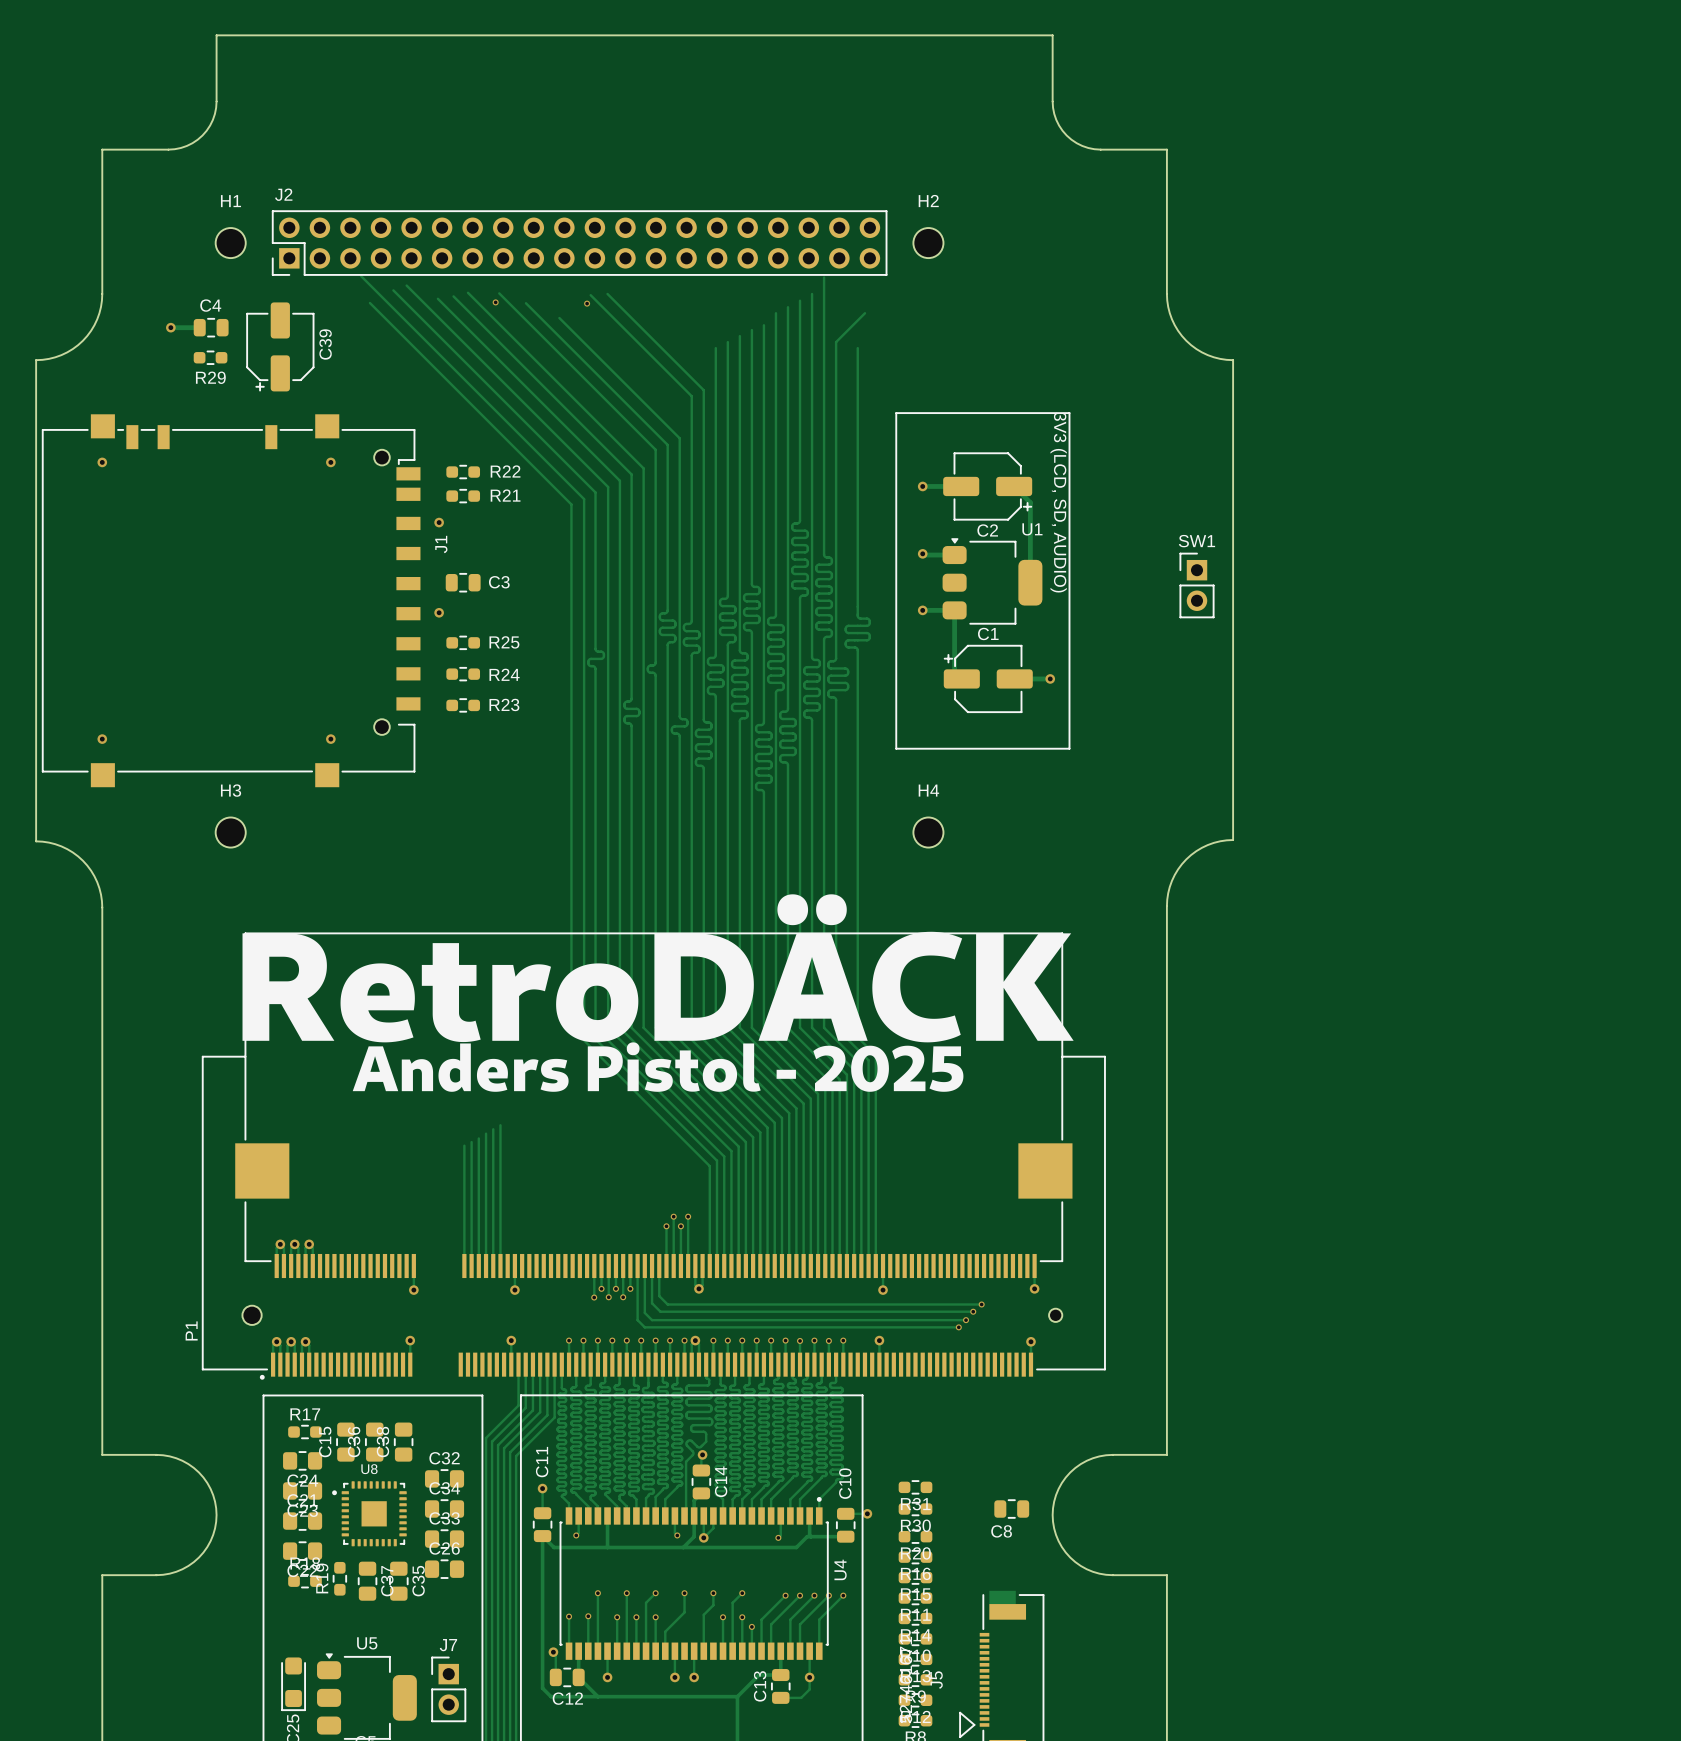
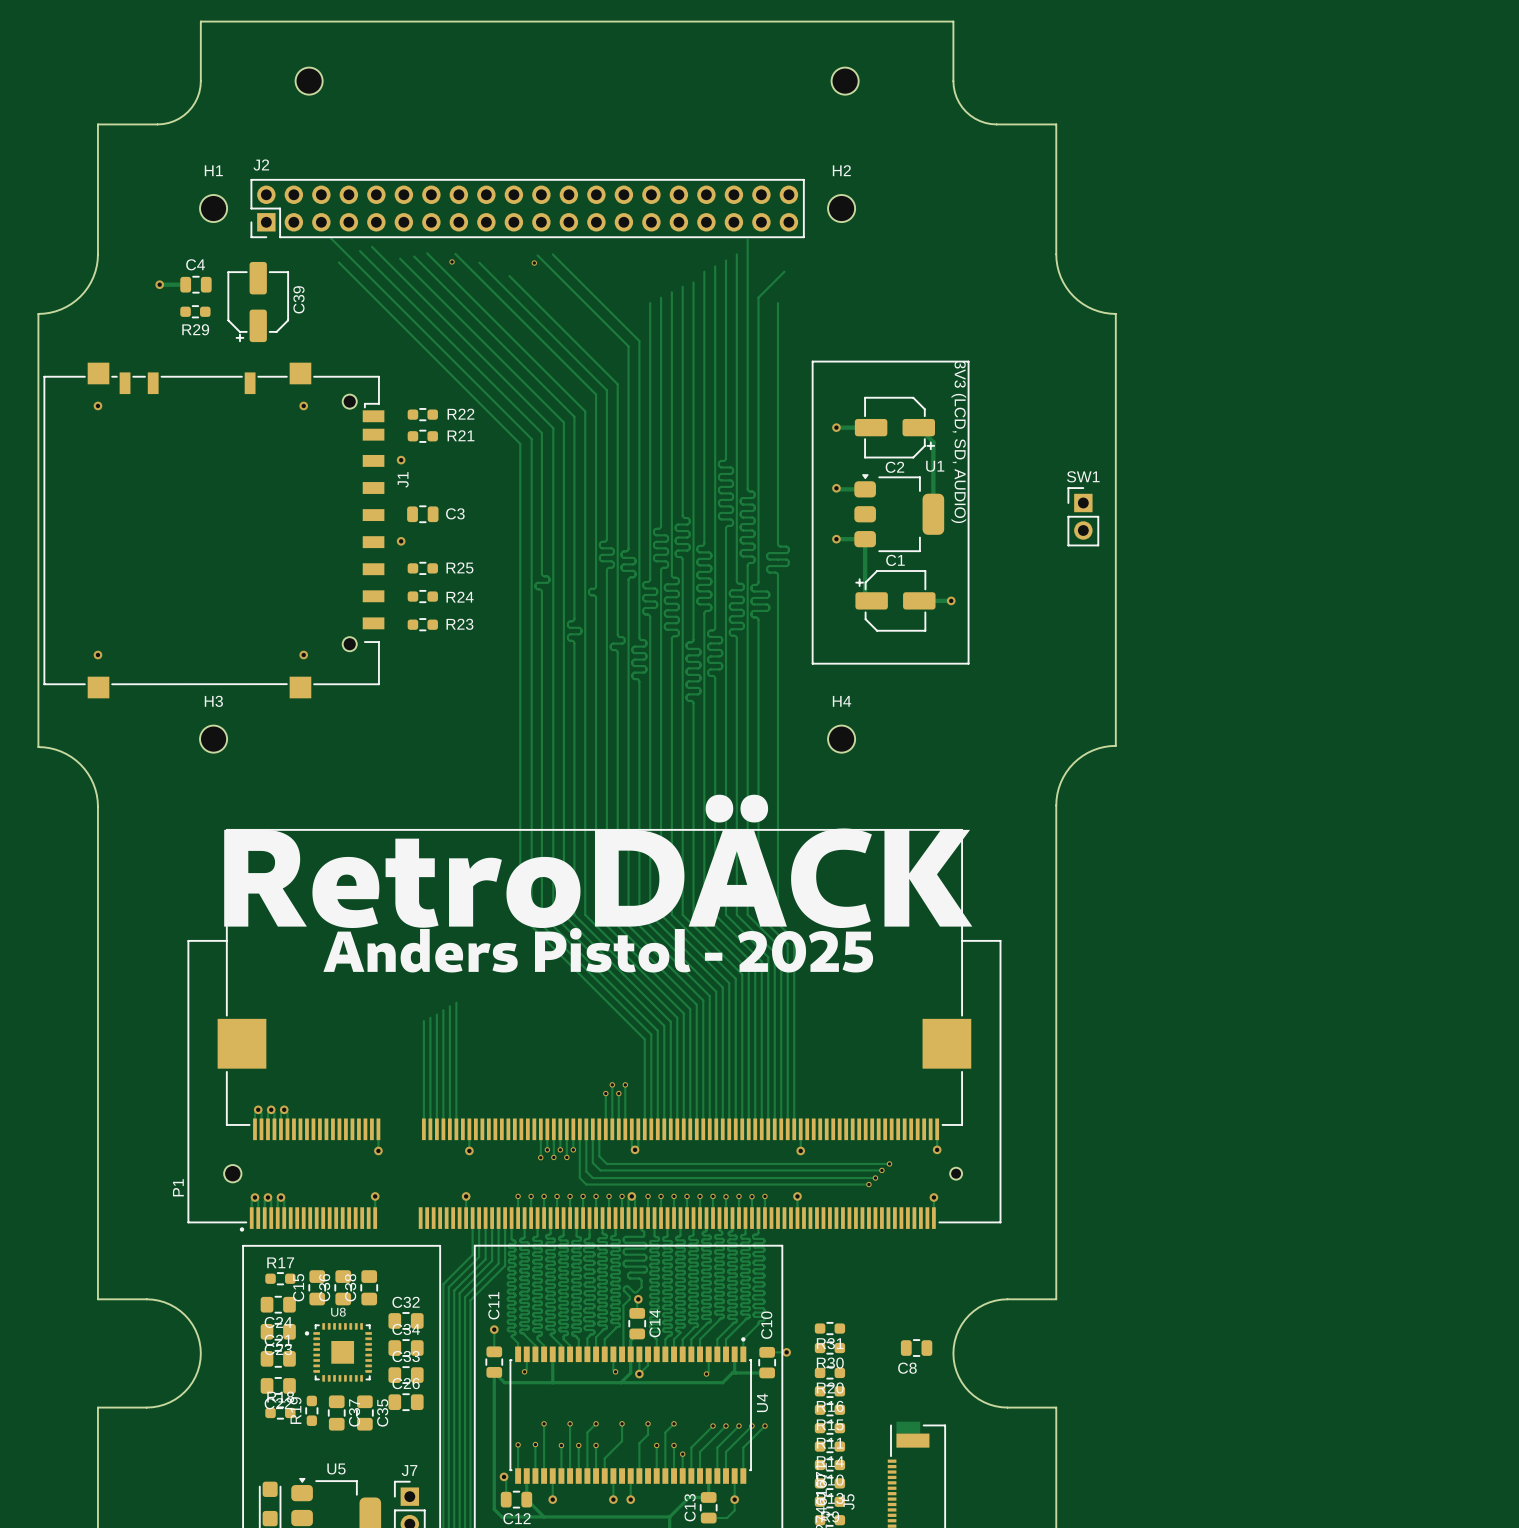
part: none -> (309, 81)
part: none -> (845, 81)

